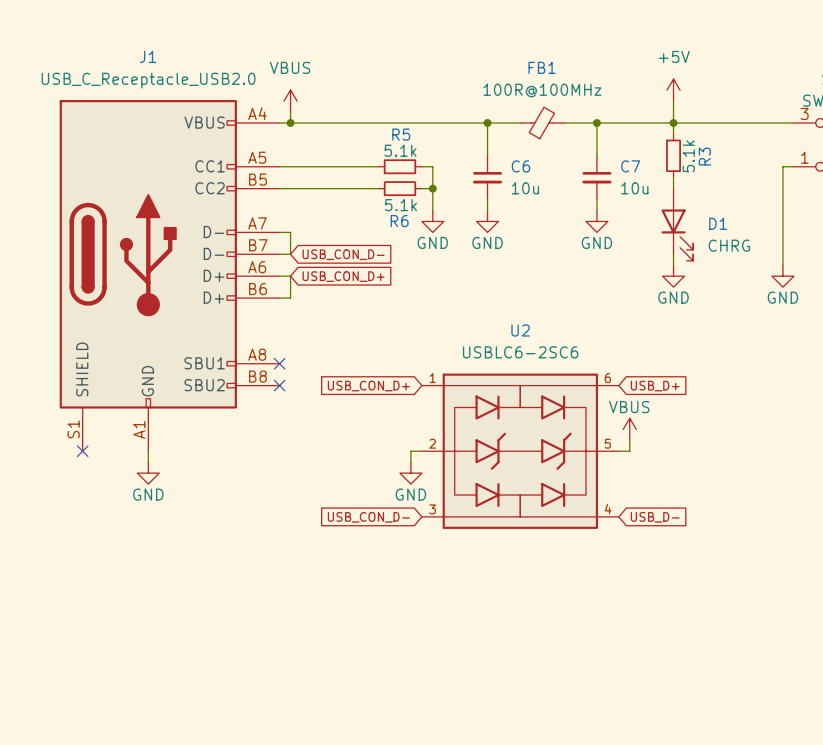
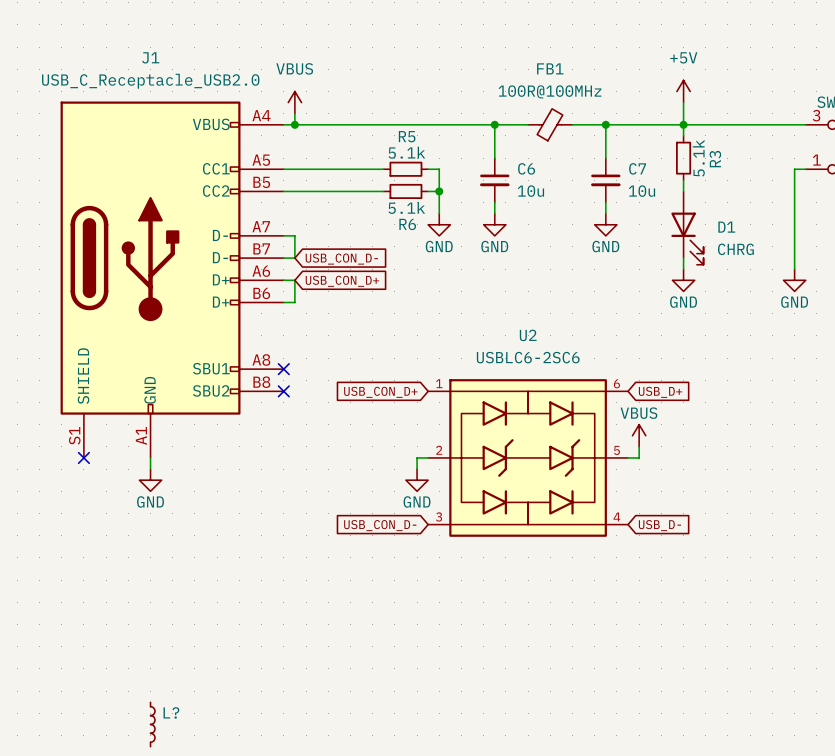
L?: none -> (152, 724)

